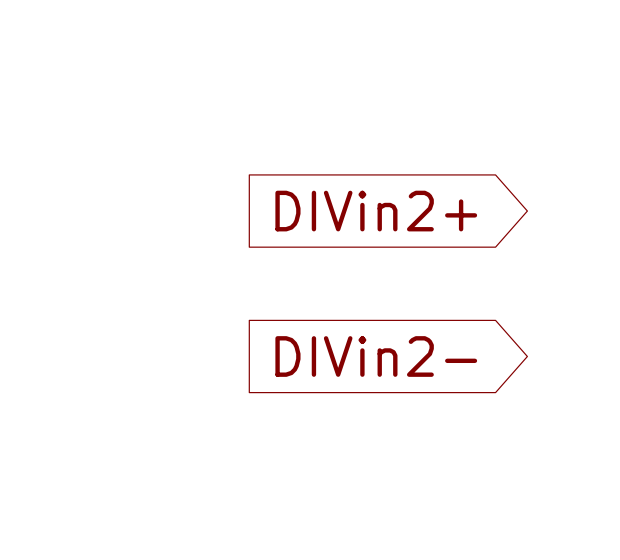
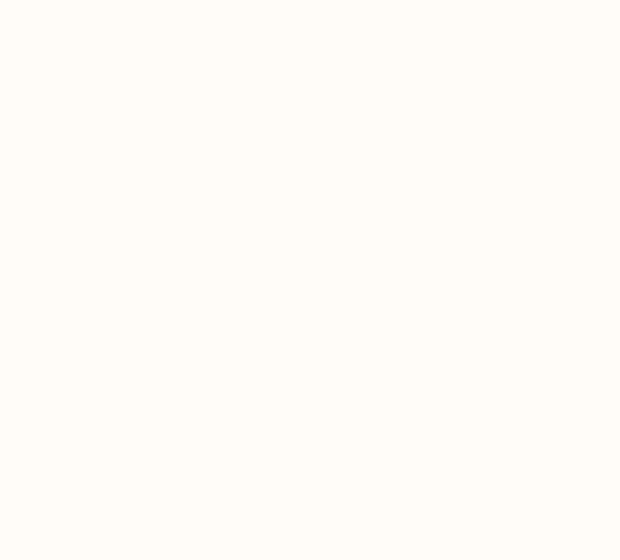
global label: DIVin2+ (376, 211) -> none
global label: DIVin2- (376, 356) -> none

